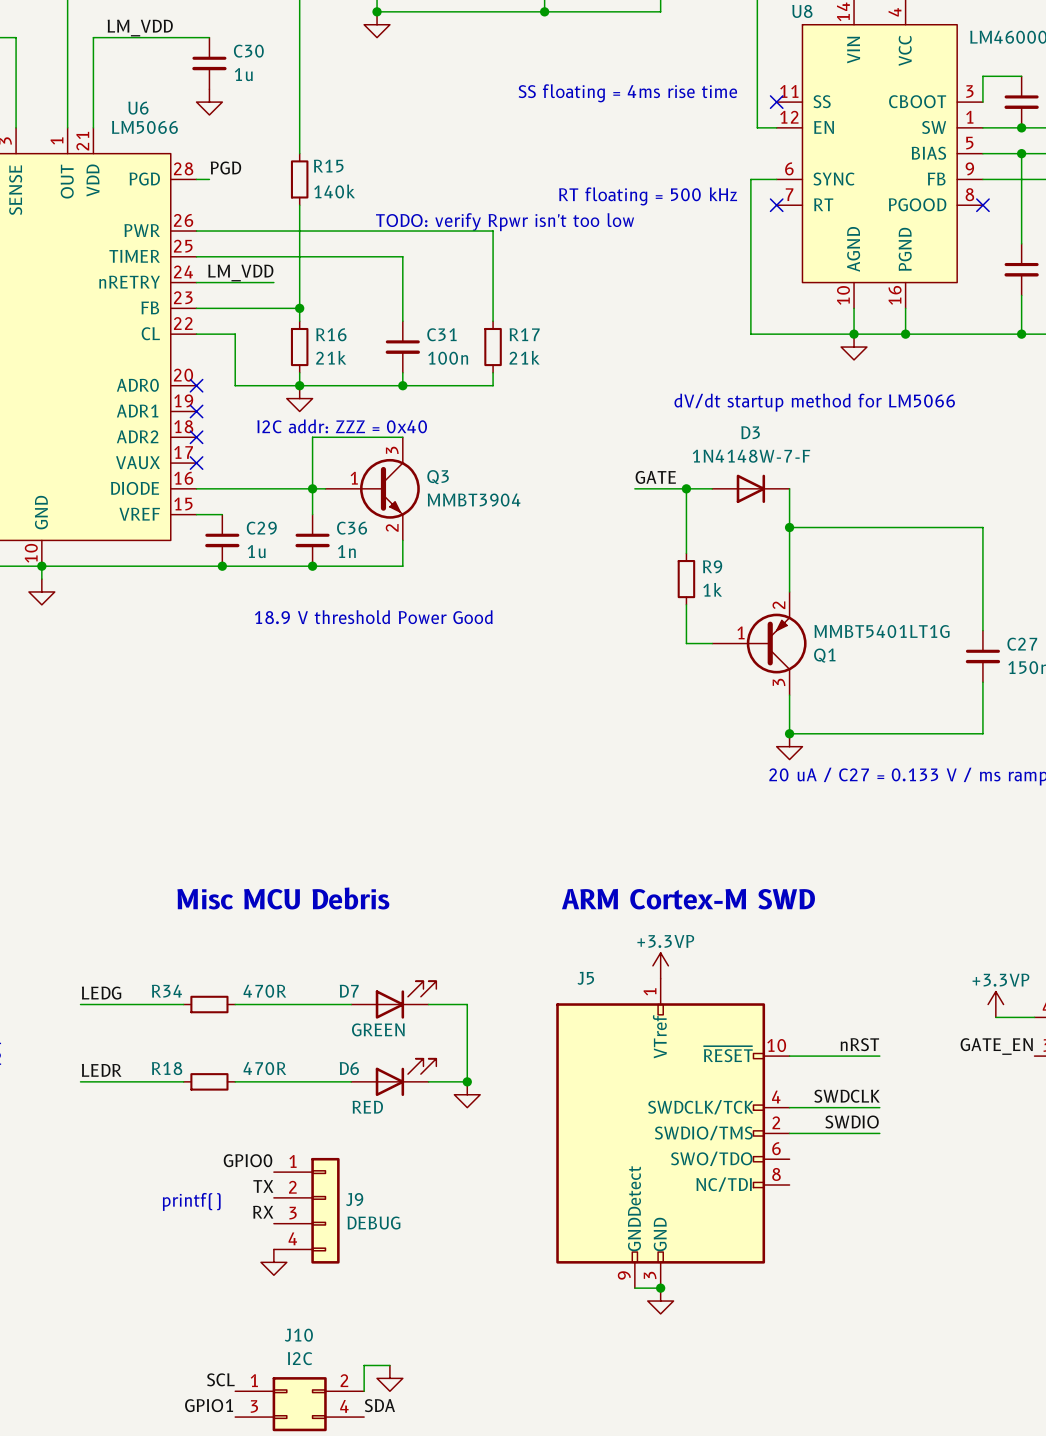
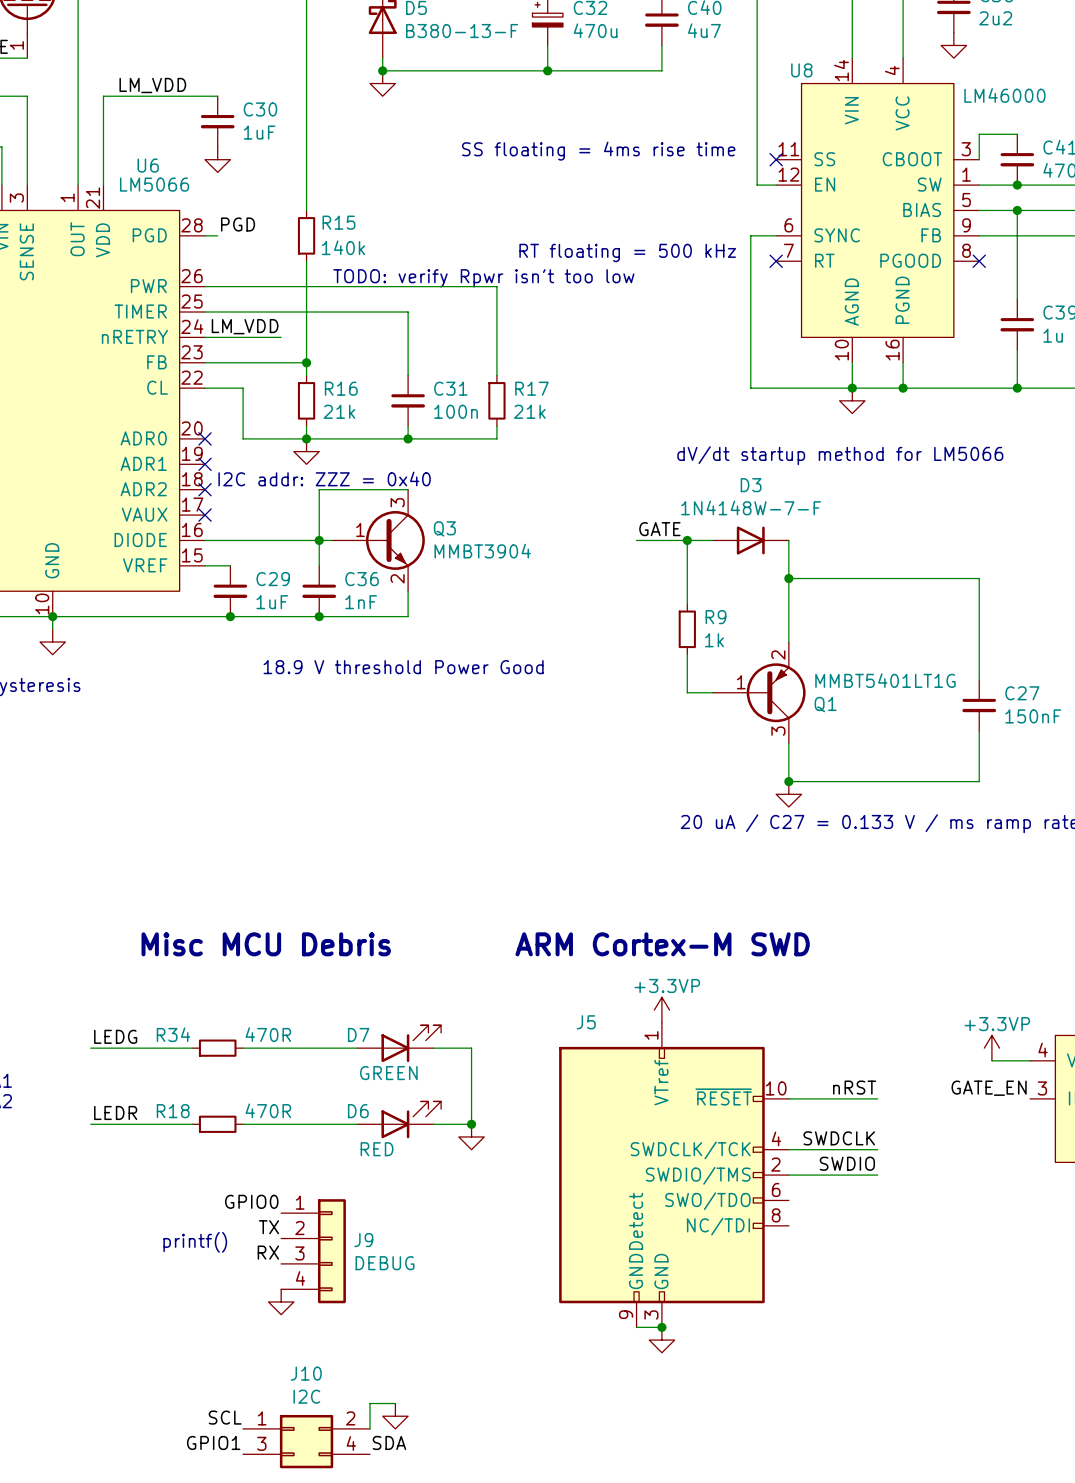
C30 value: 1u (243, 74) -> 1uF (259, 132)
C29 value: 1u (256, 551) -> 1uF (272, 602)
C36 value: 1n (346, 551) -> 1nF (361, 602)

